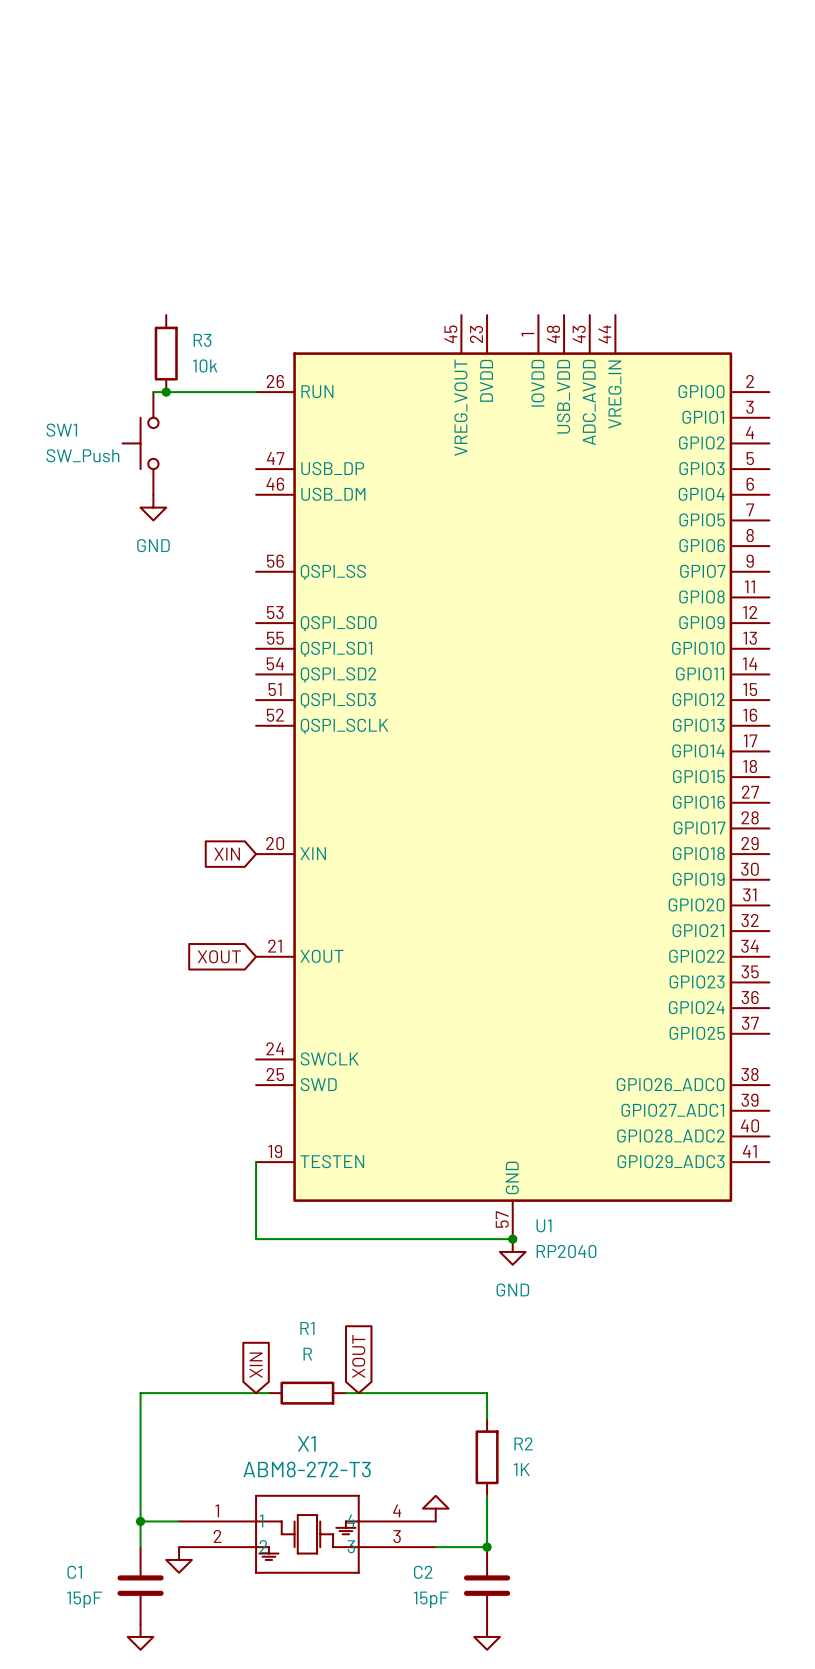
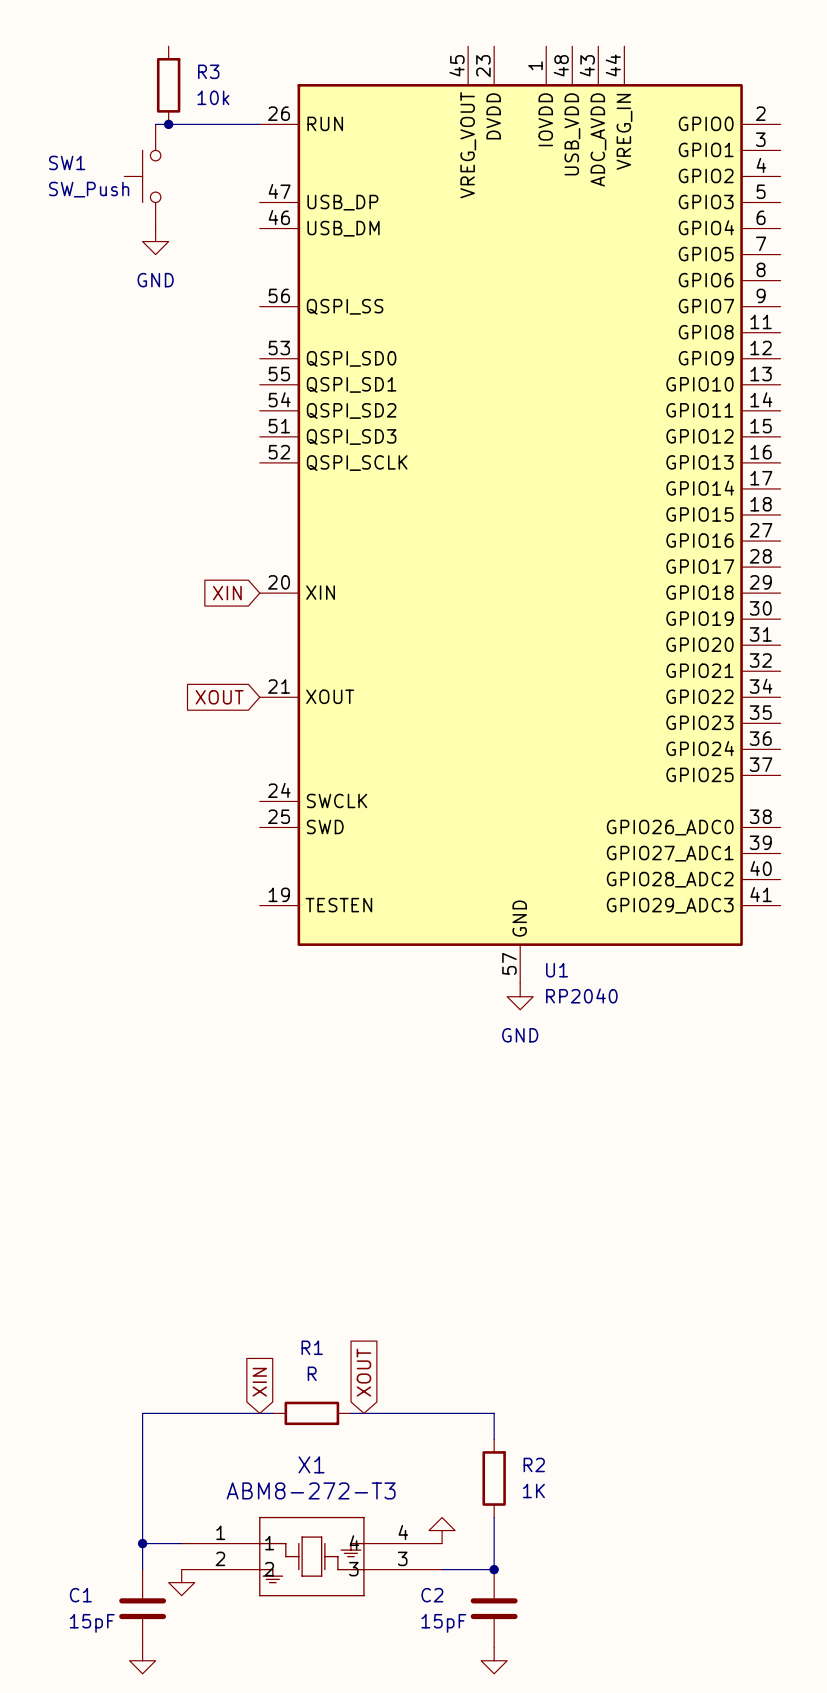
wire: none -> (155, 124) (259, 124)
junction: none -> (168, 124)
power symbol: none -> GND (155, 241)
R3 position: (166, 353) -> (168, 85)
wire: (153, 392) (256, 392) -> none
junction: (166, 392) -> none
SW1 position: (140, 443) -> (142, 176)
power symbol: GND (153, 507) -> none
global label: none -> XIN (227, 593)
global label: none -> XOUT (219, 697)
U1 position: (512, 777) -> (520, 514)
global label: XIN (227, 854) -> none
global label: XOUT (219, 956) -> none
power symbol: none -> GND (520, 996)
wire: (256, 1162) (256, 1239) (512, 1239) -> none
junction: (512, 1239) -> none
power symbol: GND (512, 1251) -> none

